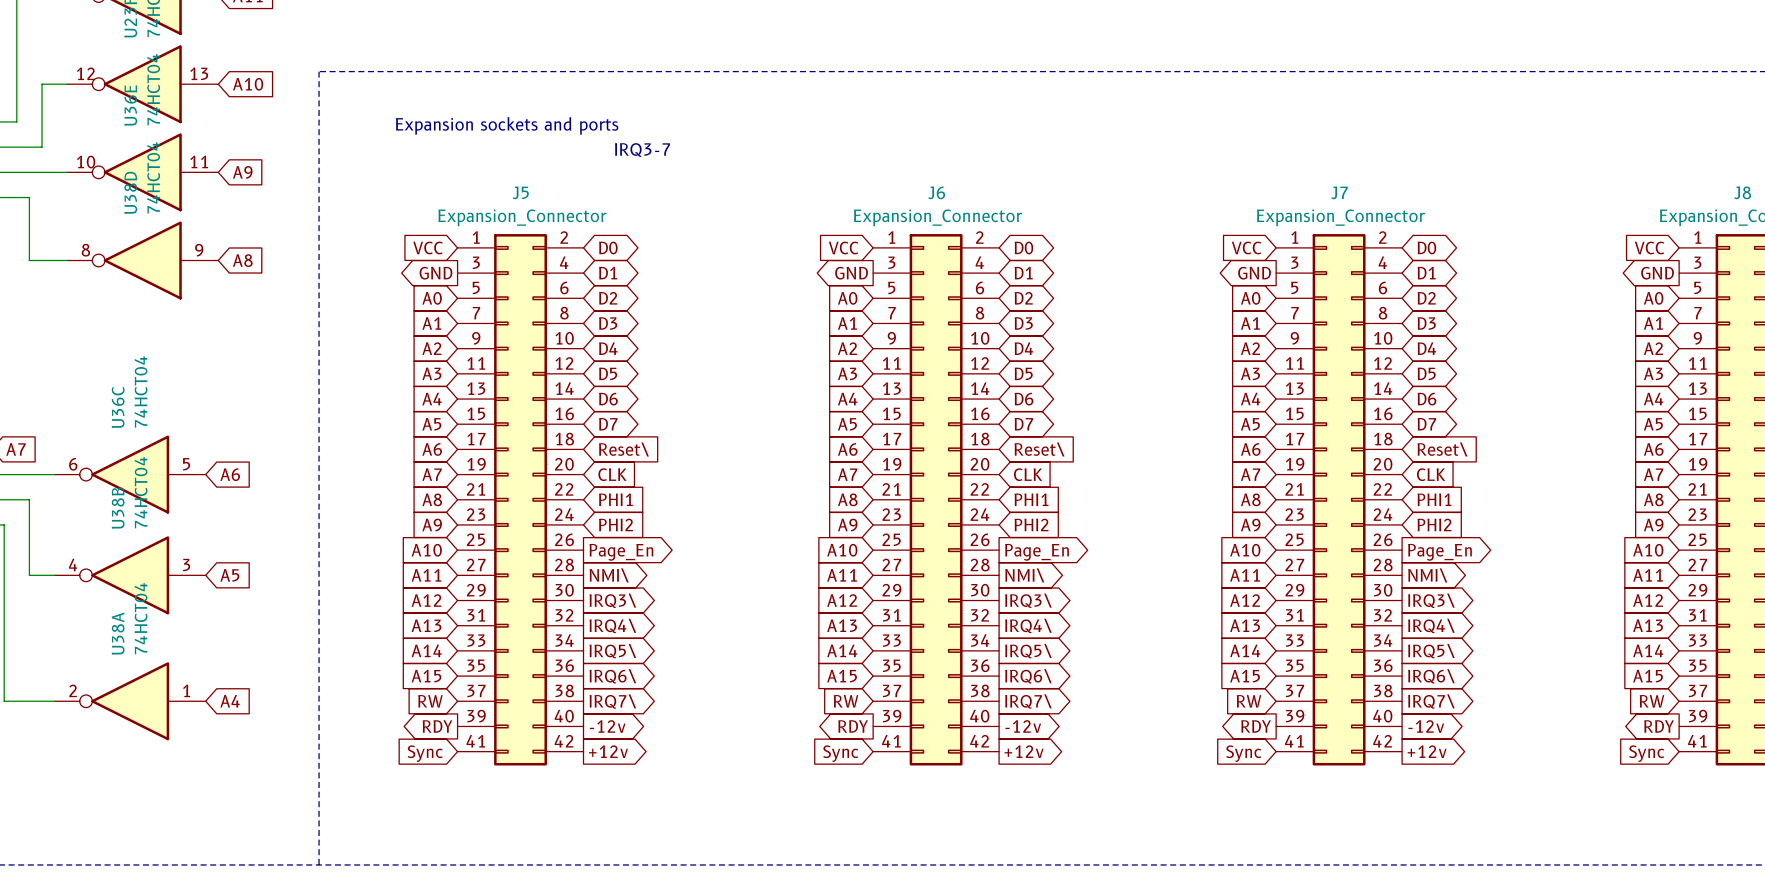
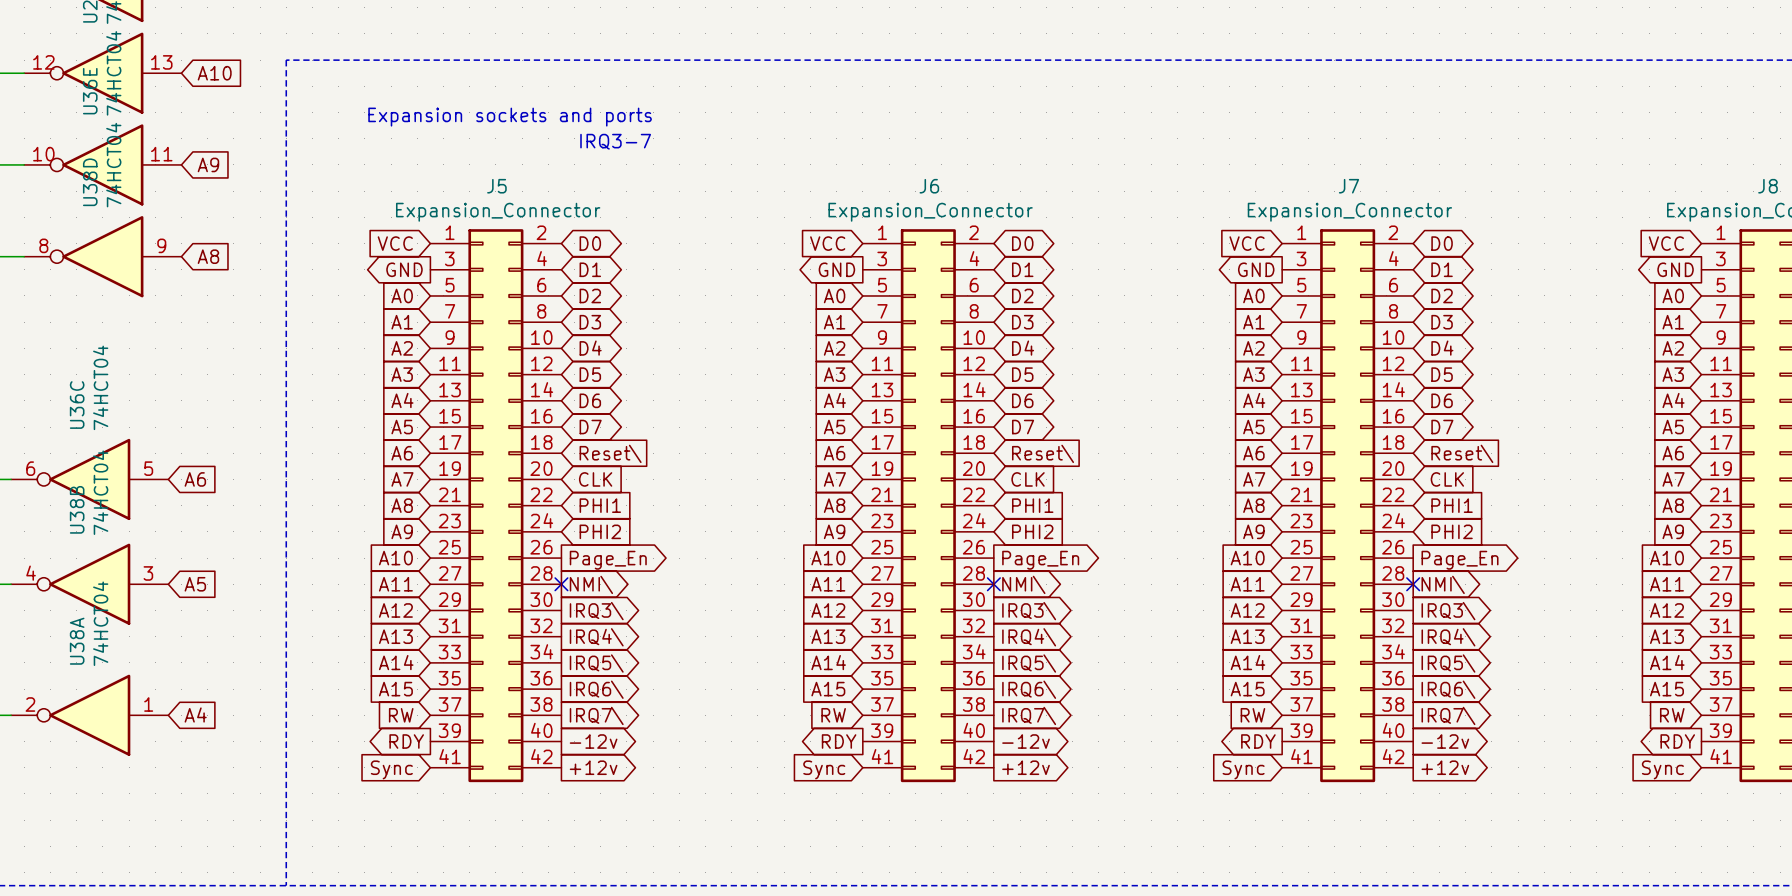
no-connect mark: none -> (561, 584)
no-connect mark: none -> (993, 584)
no-connect mark: none -> (1413, 584)

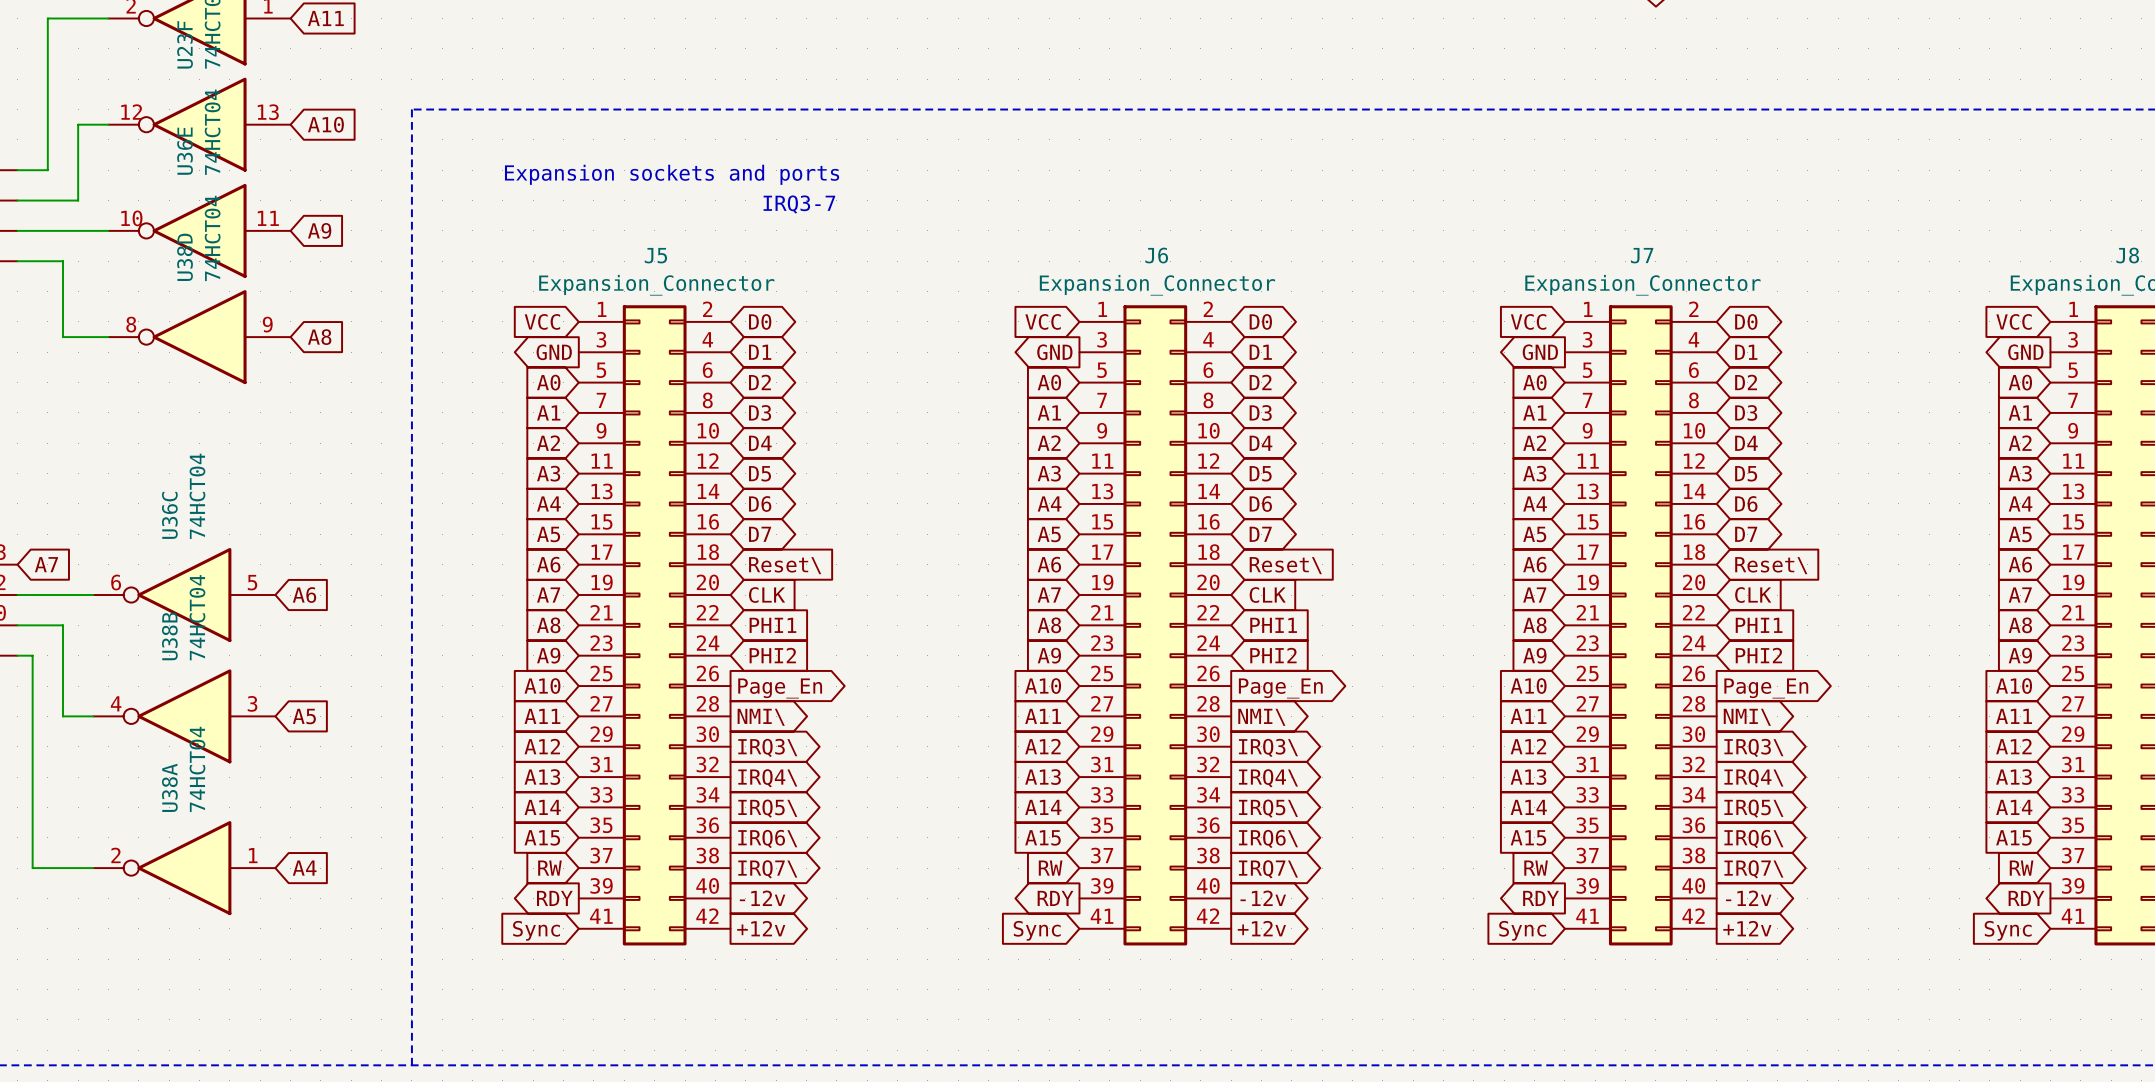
no-connect mark: (561, 584) -> none
no-connect mark: (993, 584) -> none
no-connect mark: (1413, 584) -> none

